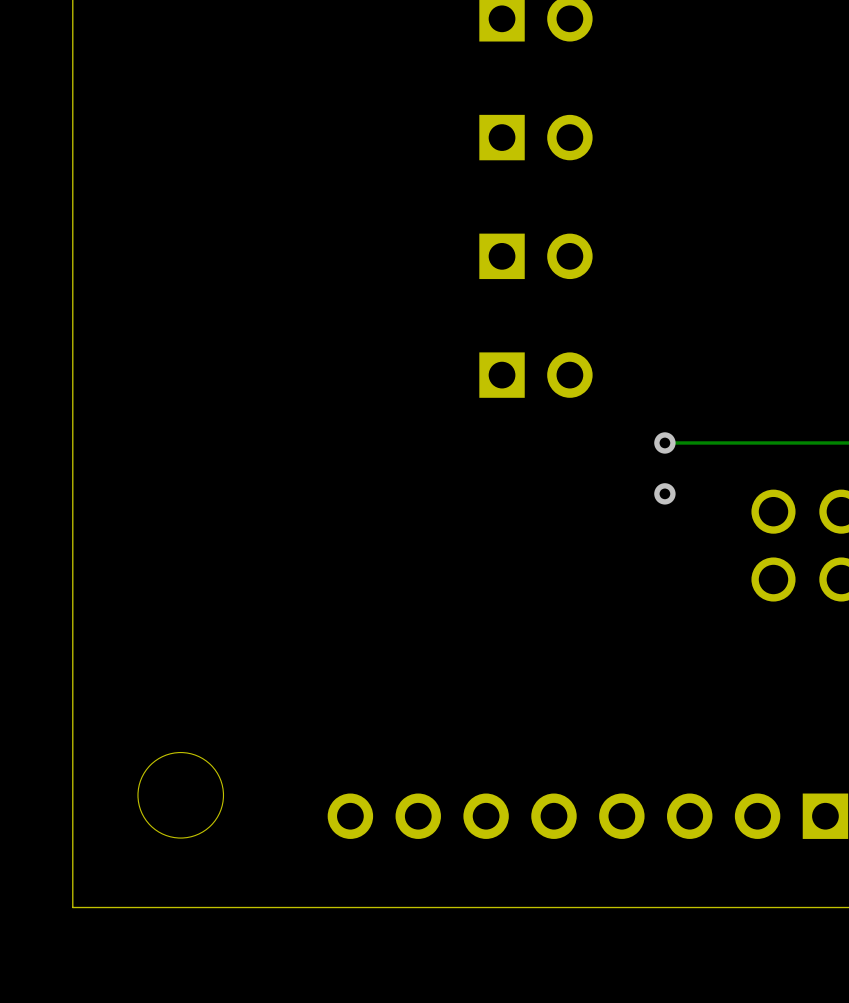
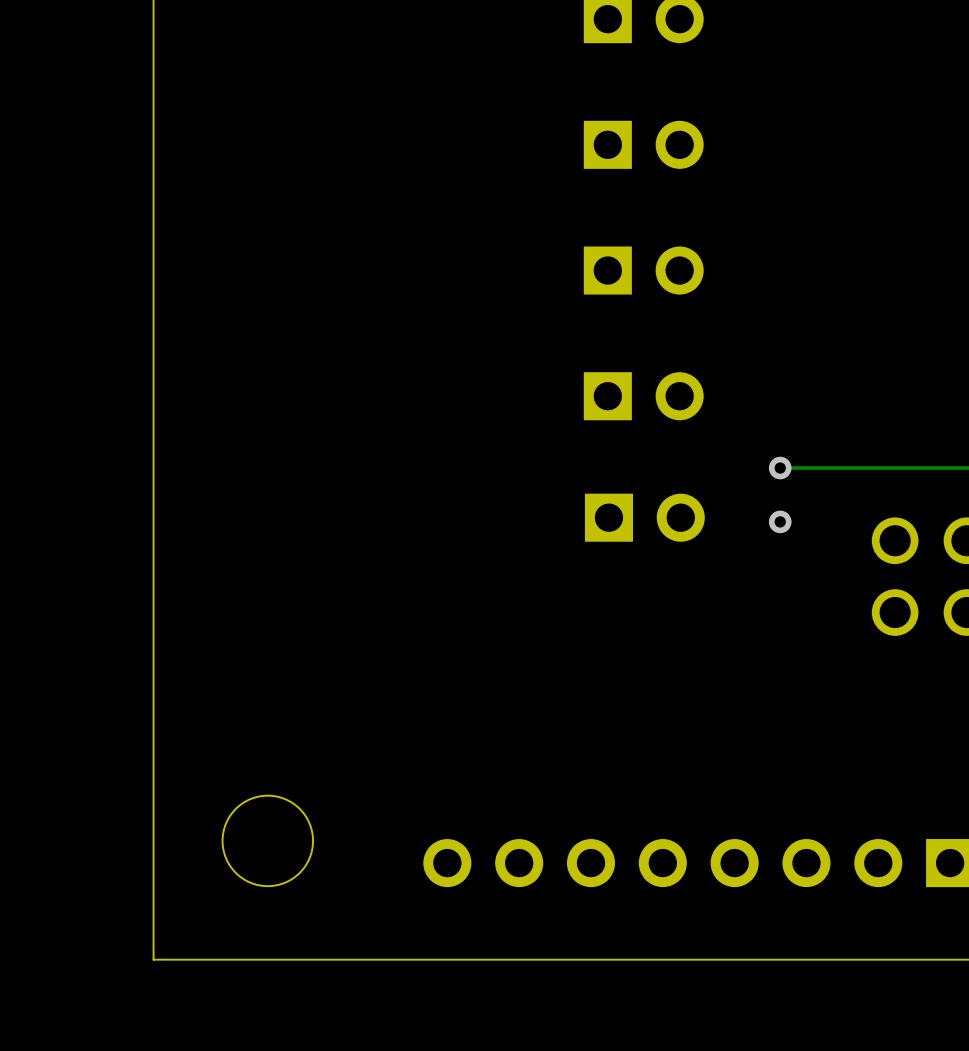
part: none -> (644, 517)

